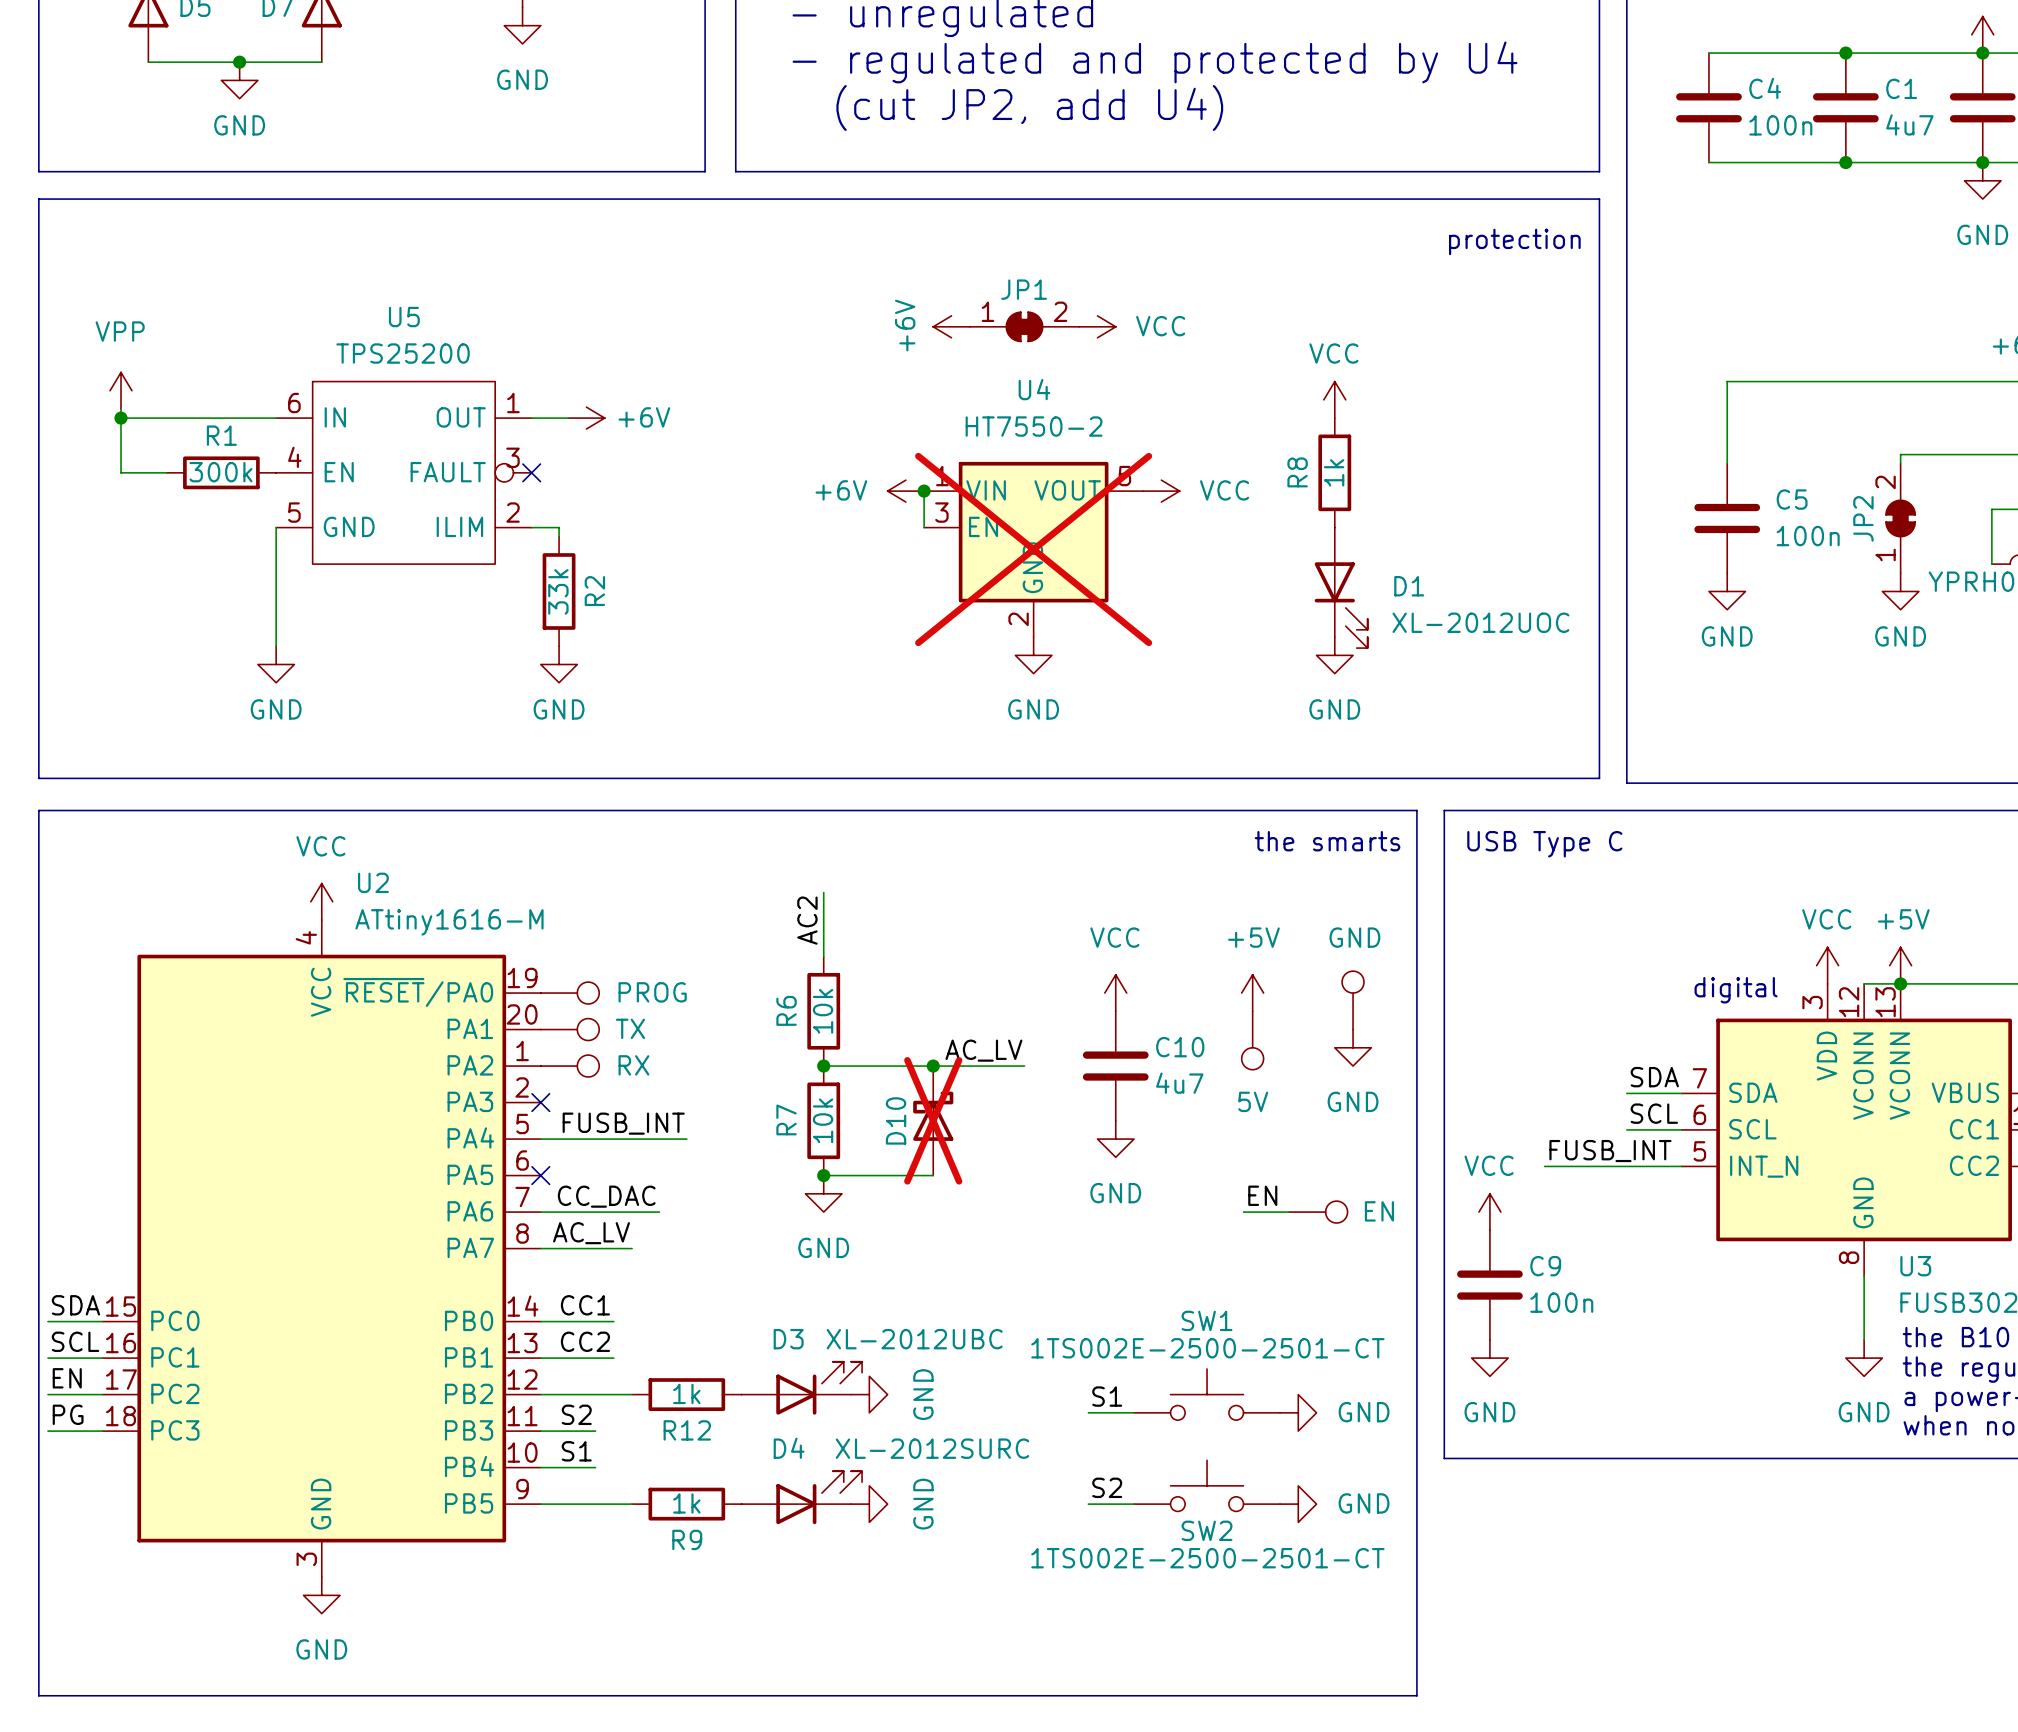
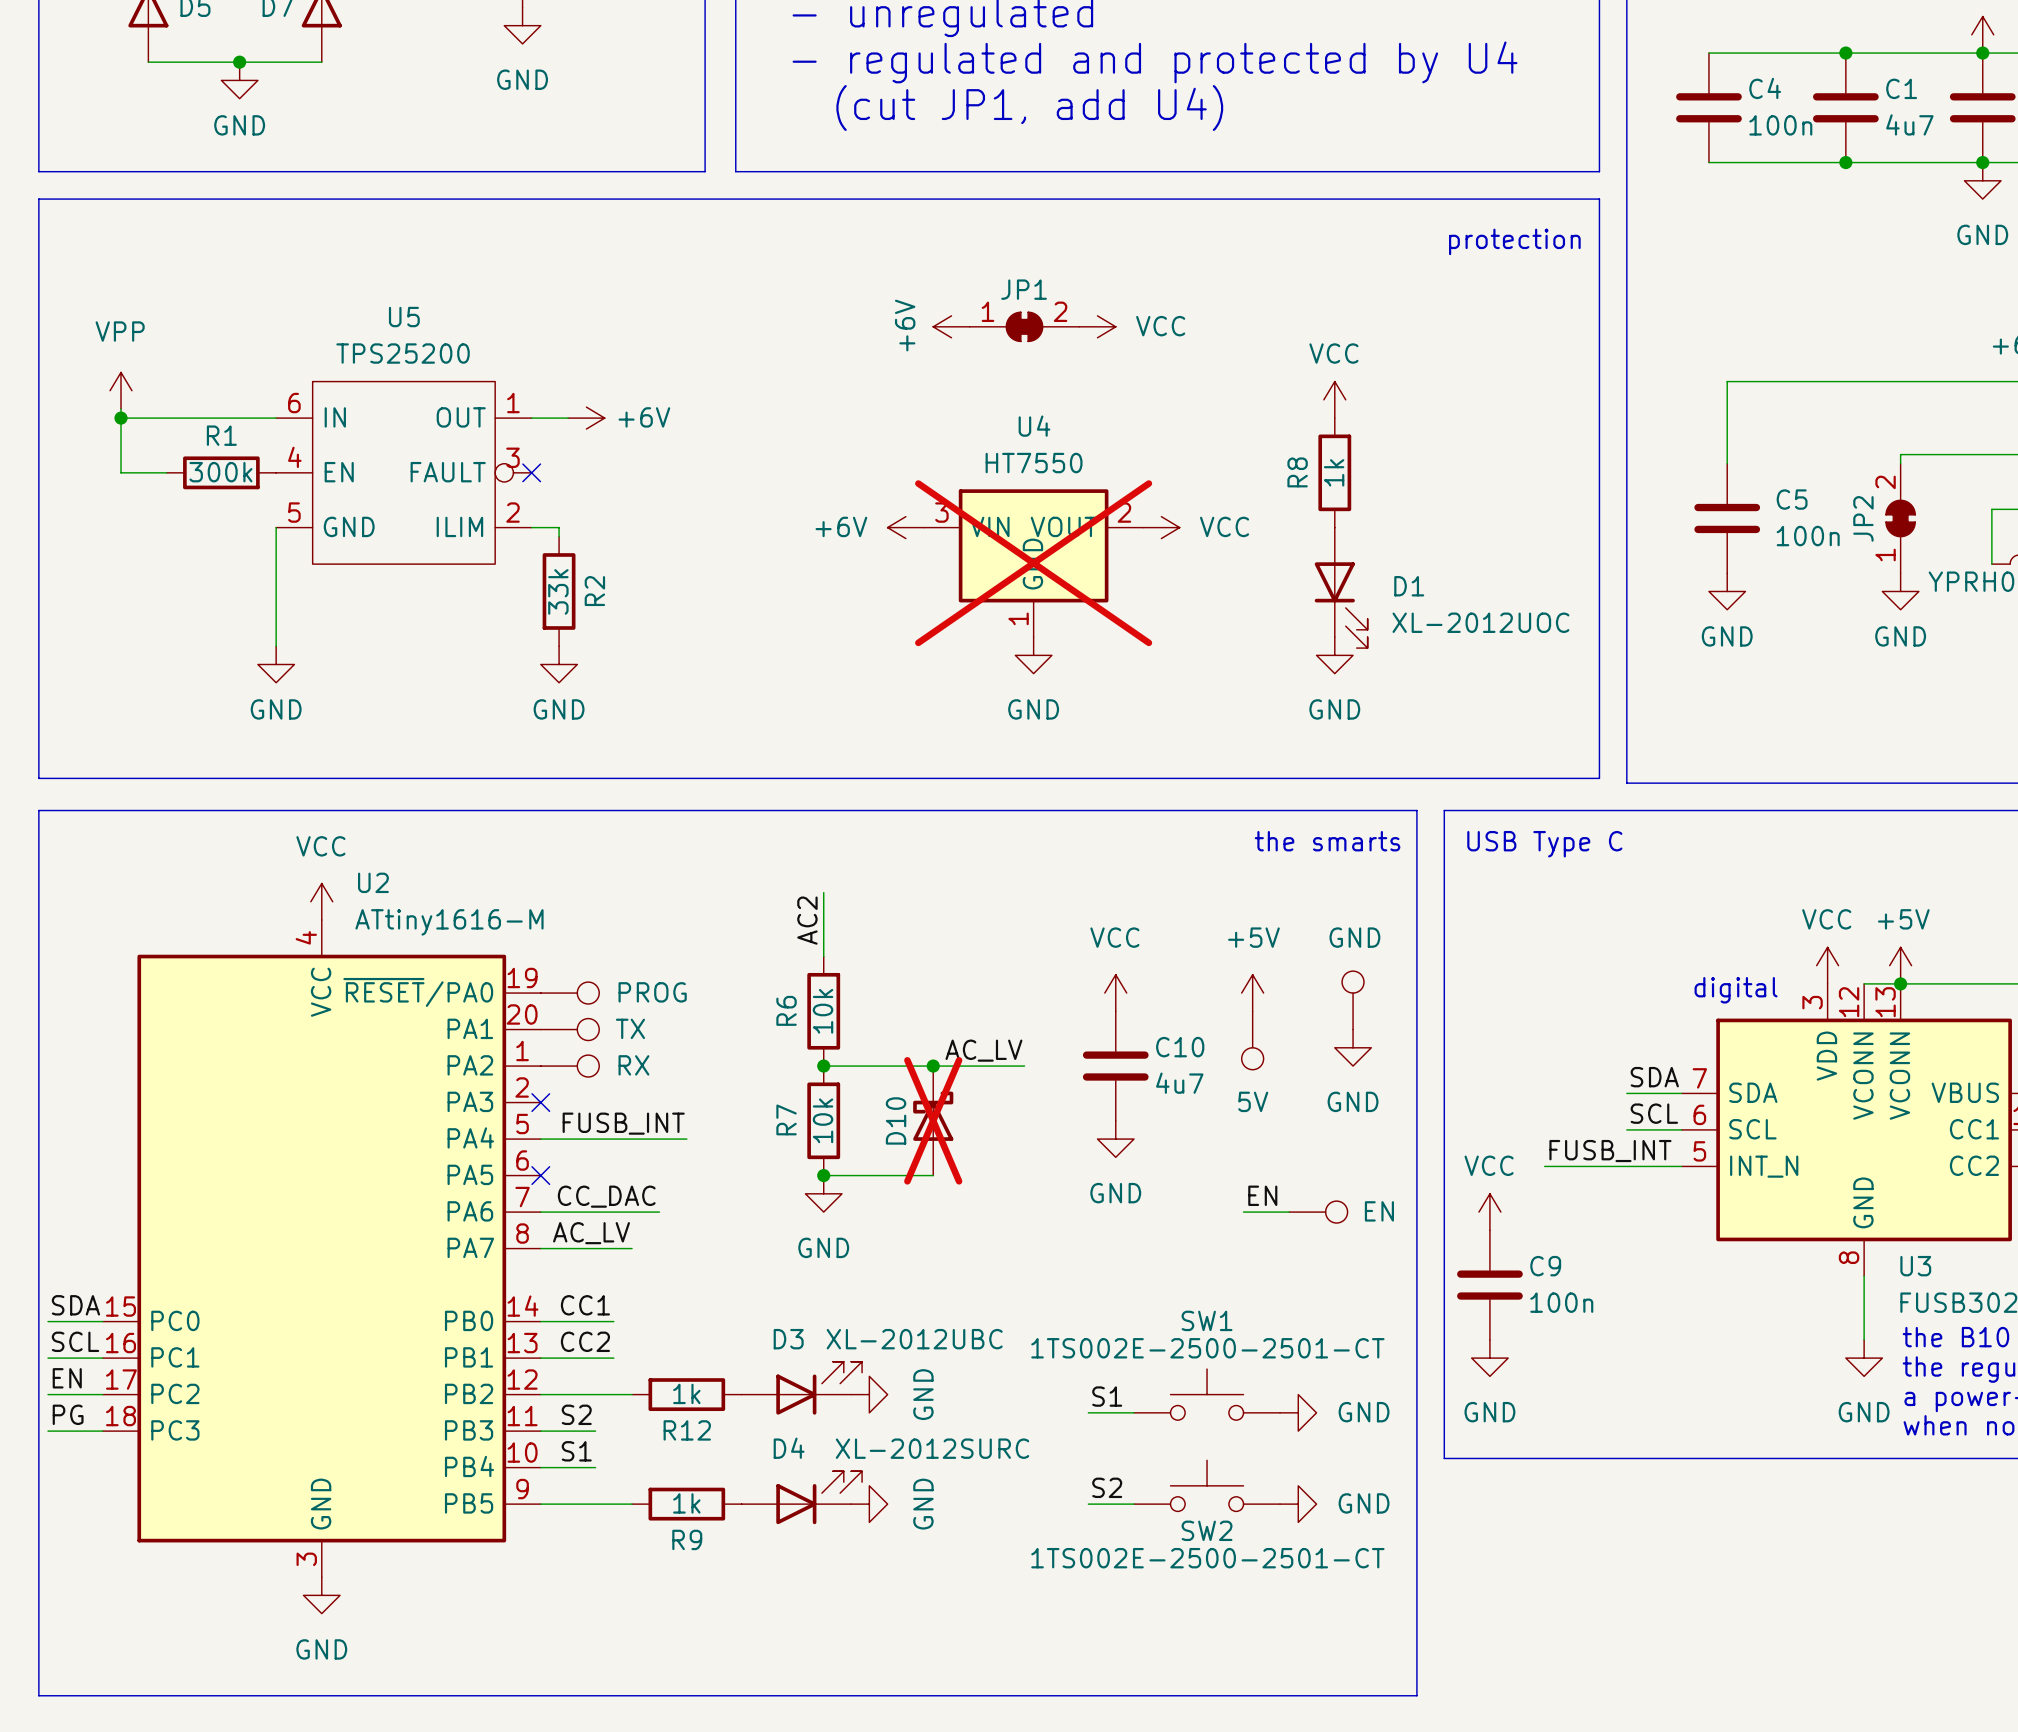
text: (cut JP2, add U4) (1029, 107) -> (cut JP1, add U4) (1029, 107)
U4 value: HT7550-2 (1034, 426) -> HT7550 (1034, 463)
U4 symbol: [924, 461, 1144, 638] -> [924, 489, 1144, 638]
power symbol position: +6V (905, 491) -> +6V (905, 527)
wire: (924, 491) (924, 527) -> none
junction: (924, 491) -> none
power symbol position: VCC (1161, 491) -> VCC (1161, 527)

